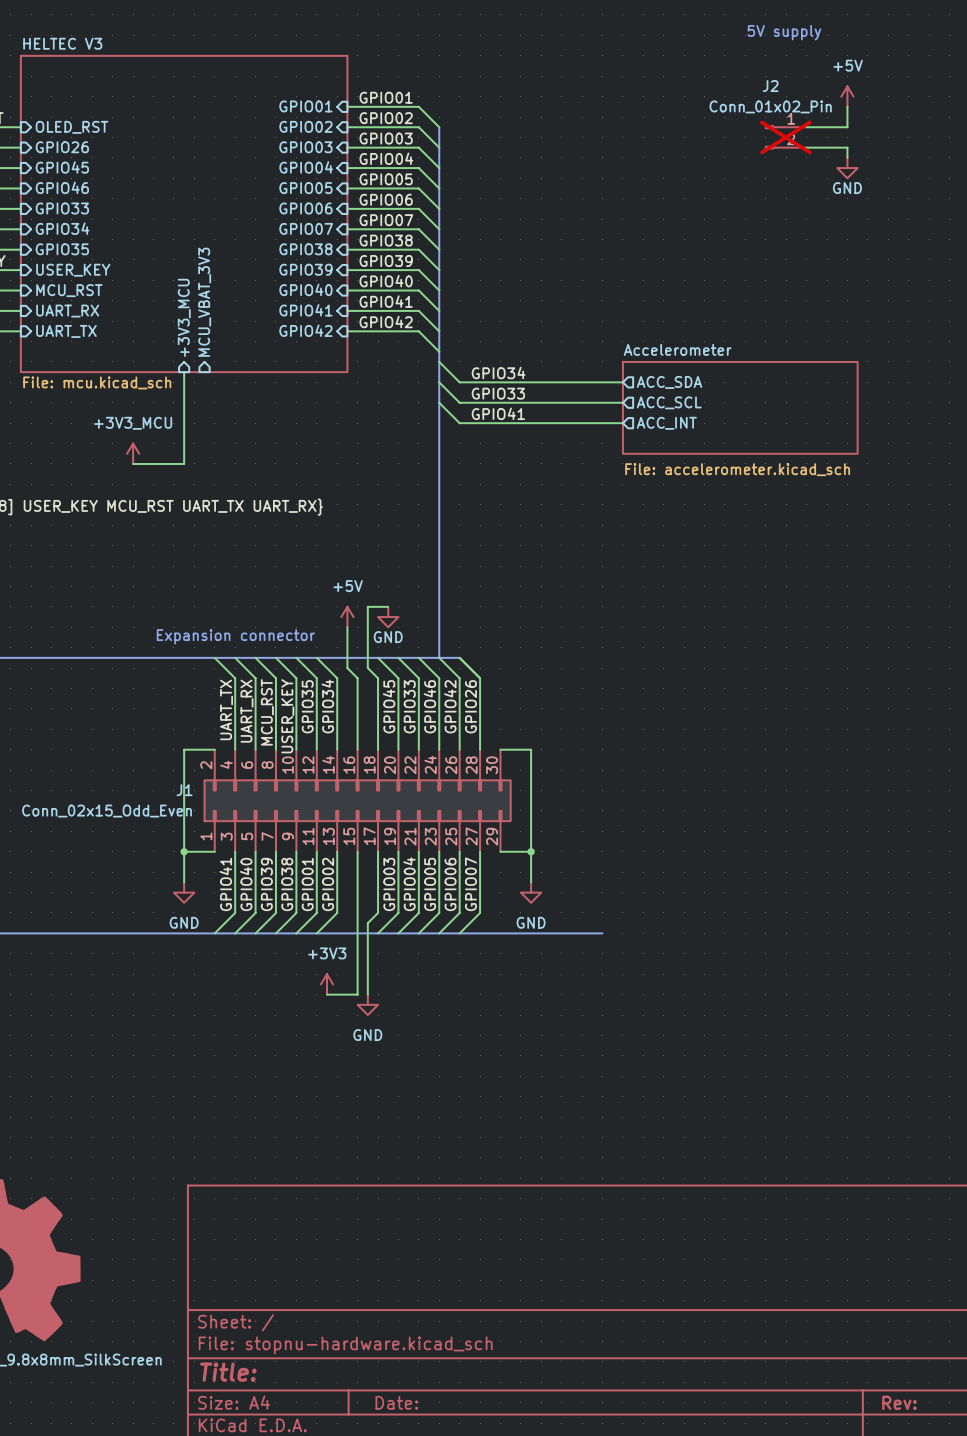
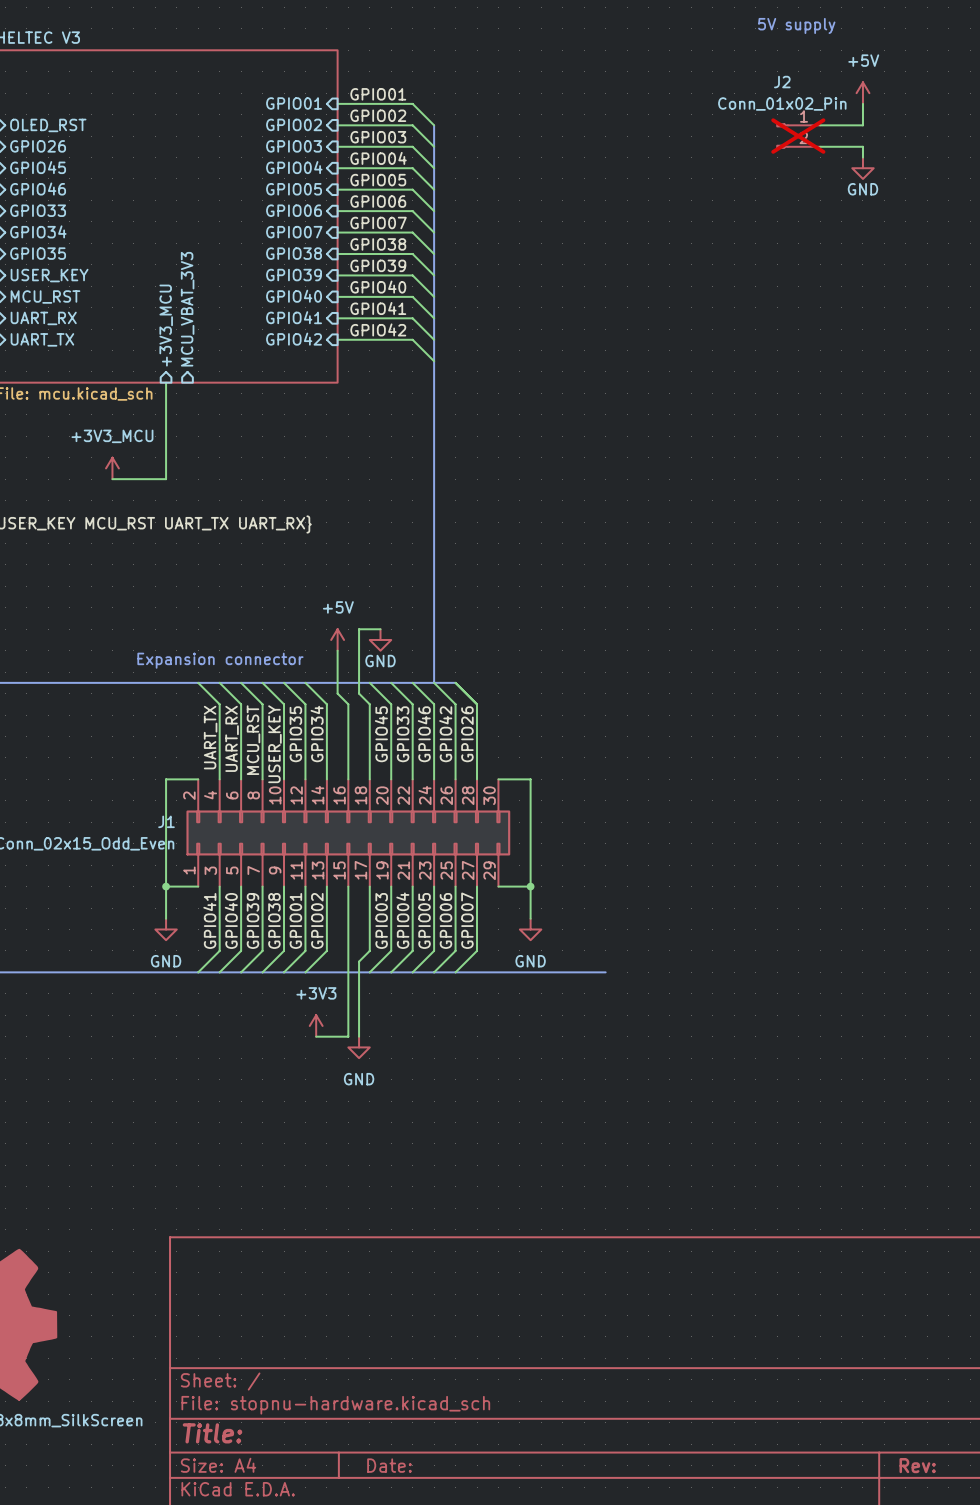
wire: (439, 361) (459, 382) (622, 382) -> none
label: GPIO34 (498, 373) -> none
wire: (439, 382) (459, 402) (622, 402) -> none
sheet pin: ACC_SDA (669, 382) -> none
label: GPIO33 (498, 393) -> none
wire: (439, 402) (459, 423) (622, 423) -> none
sheet pin: ACC_SCL (669, 402) -> none
sheet Accelerometer: File: accelerometer.kicad_sch (740, 407) -> none
label: GPIO41 (498, 413) -> none
sheet pin: ACC_INT (666, 423) -> none

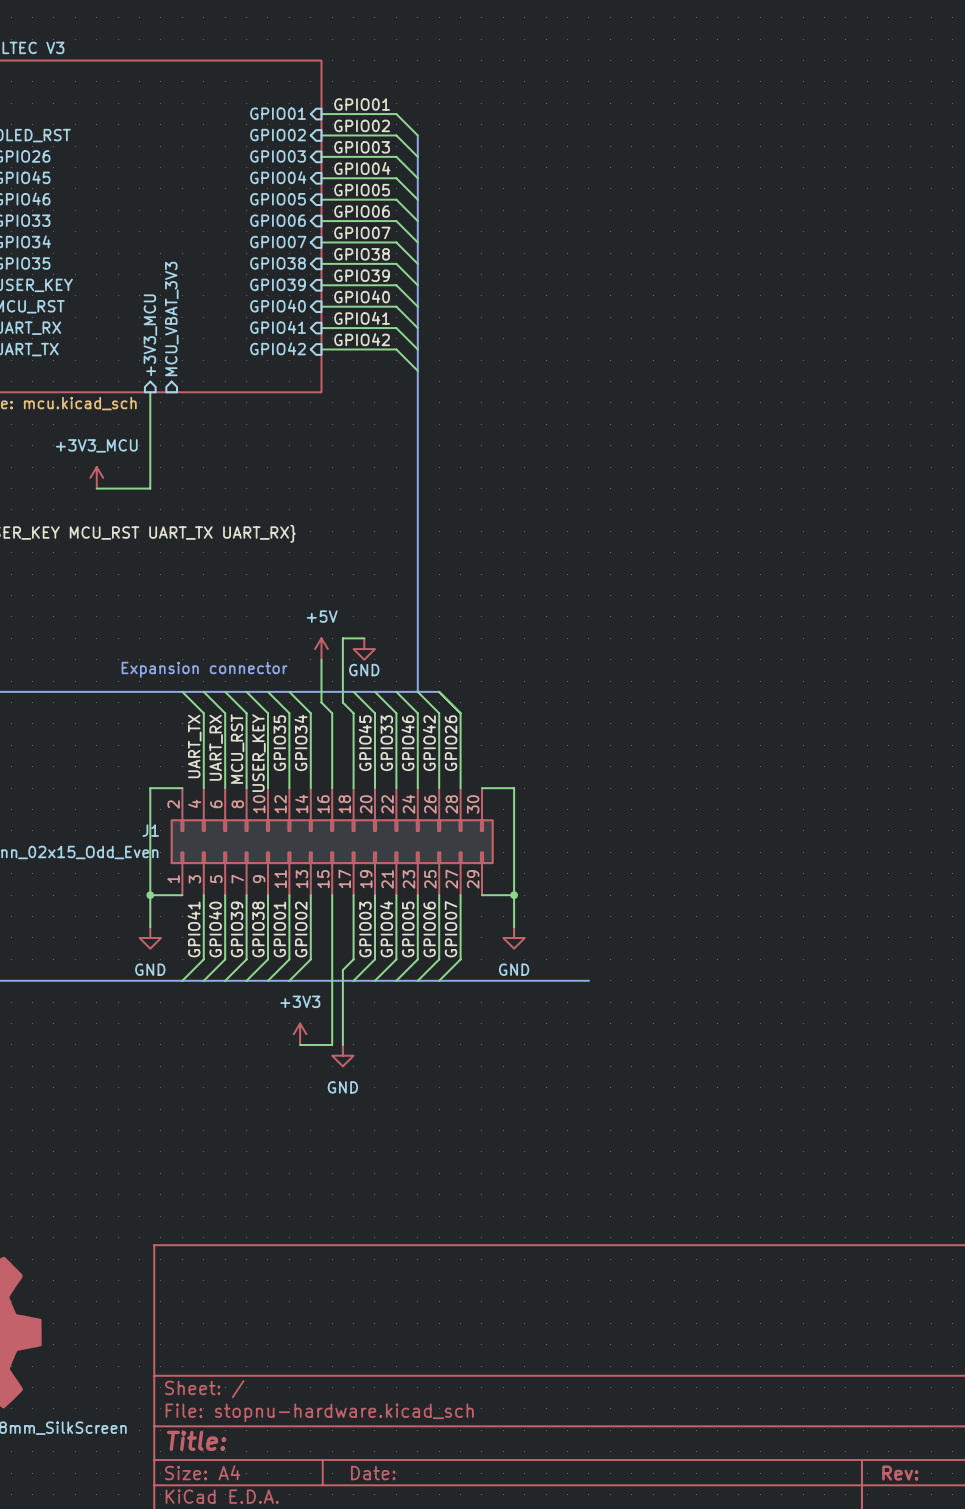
text: 5V supply (796, 25) -> none
power symbol: +5V (862, 93) -> none
wire: (862, 103) (862, 125) (820, 125) -> none
J2: Conn_01x02_Pin (798, 136) -> none
wire: (820, 146) (862, 146) (862, 157) -> none
power symbol: GND (862, 168) -> none

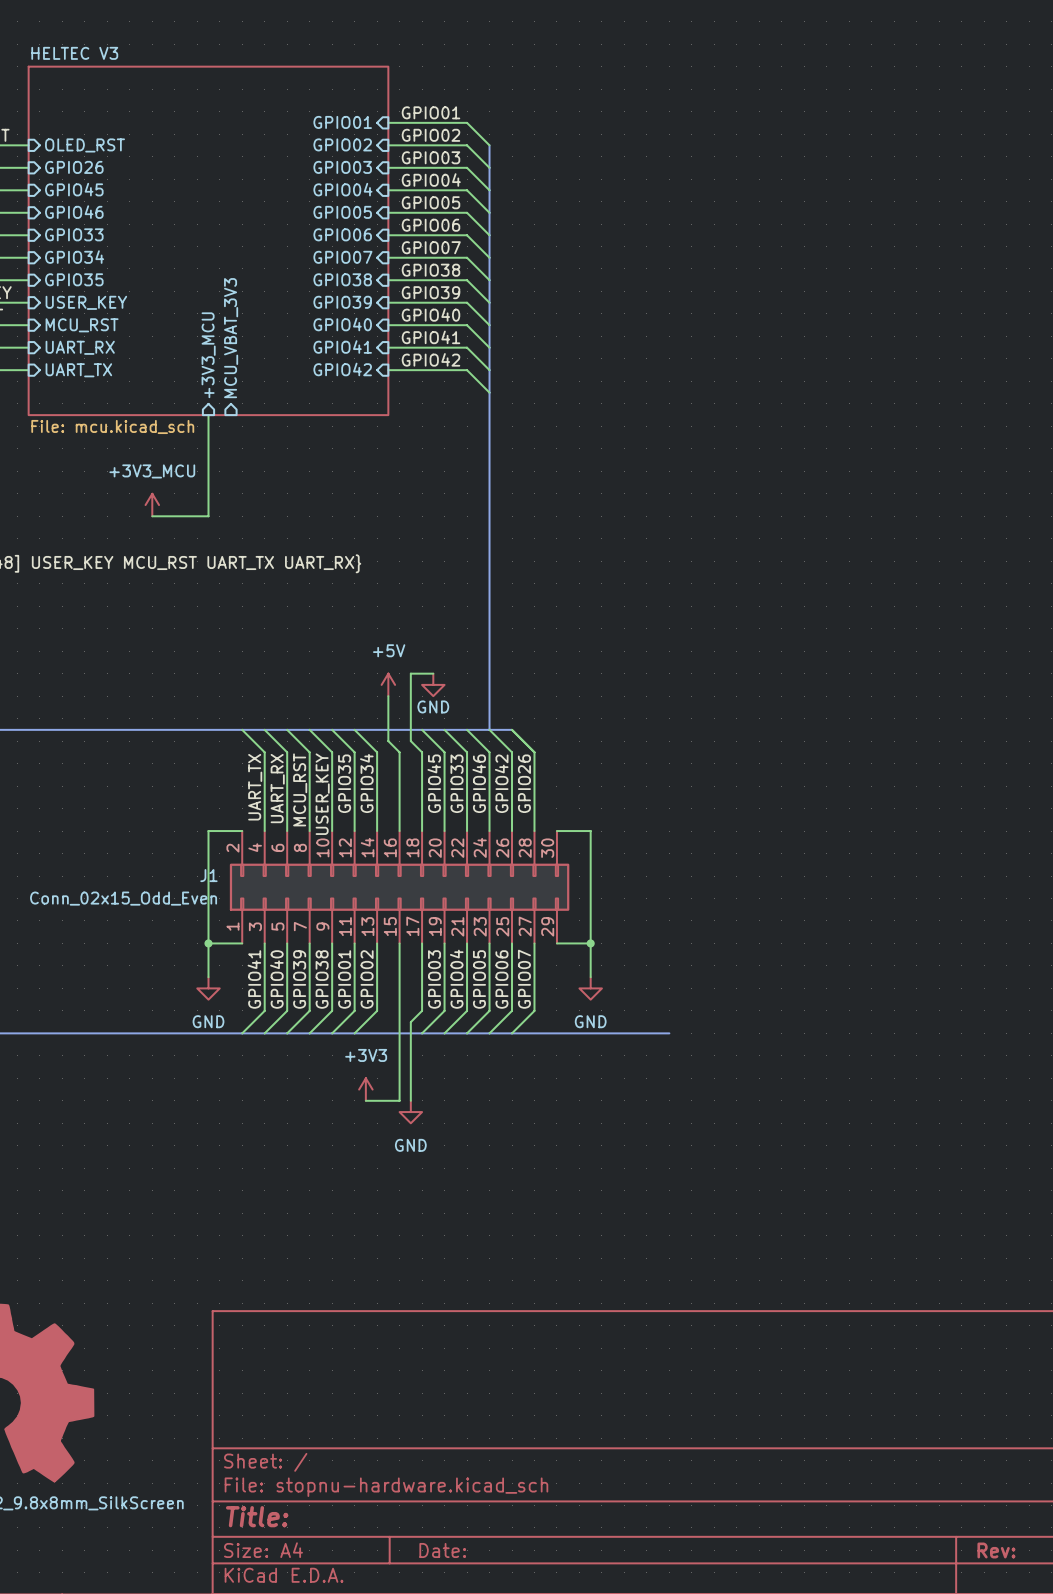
text: Expansion connector (204, 669) -> none

